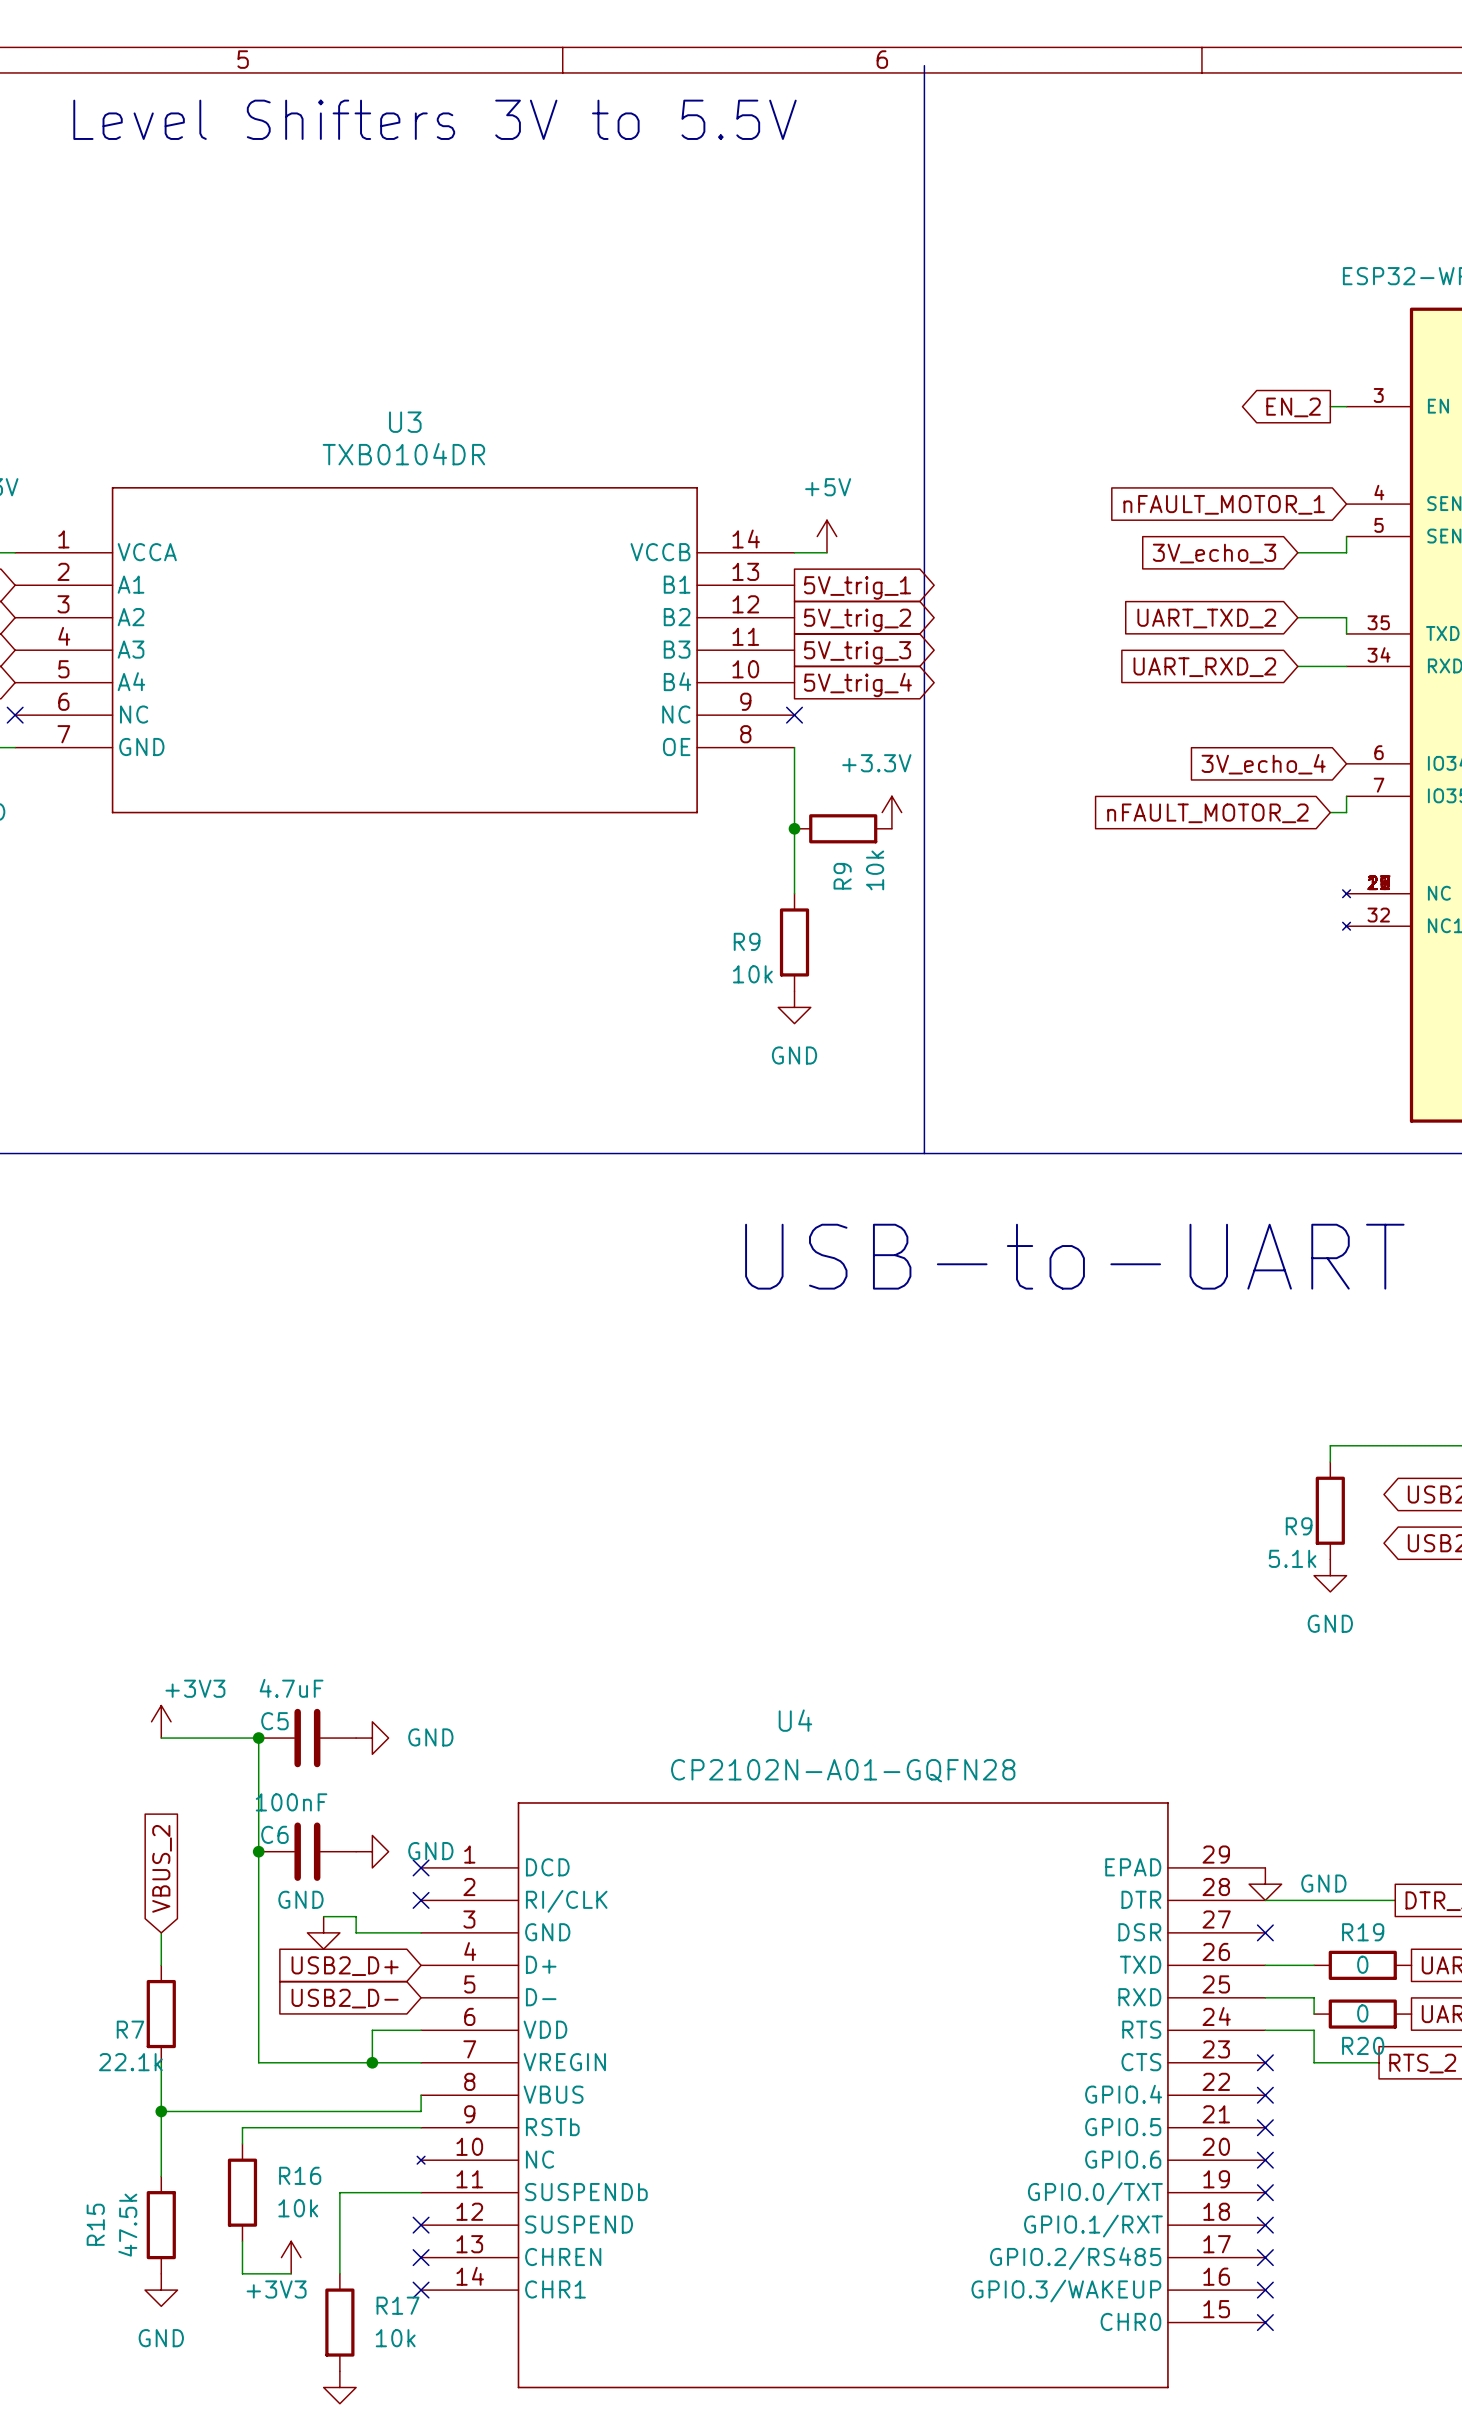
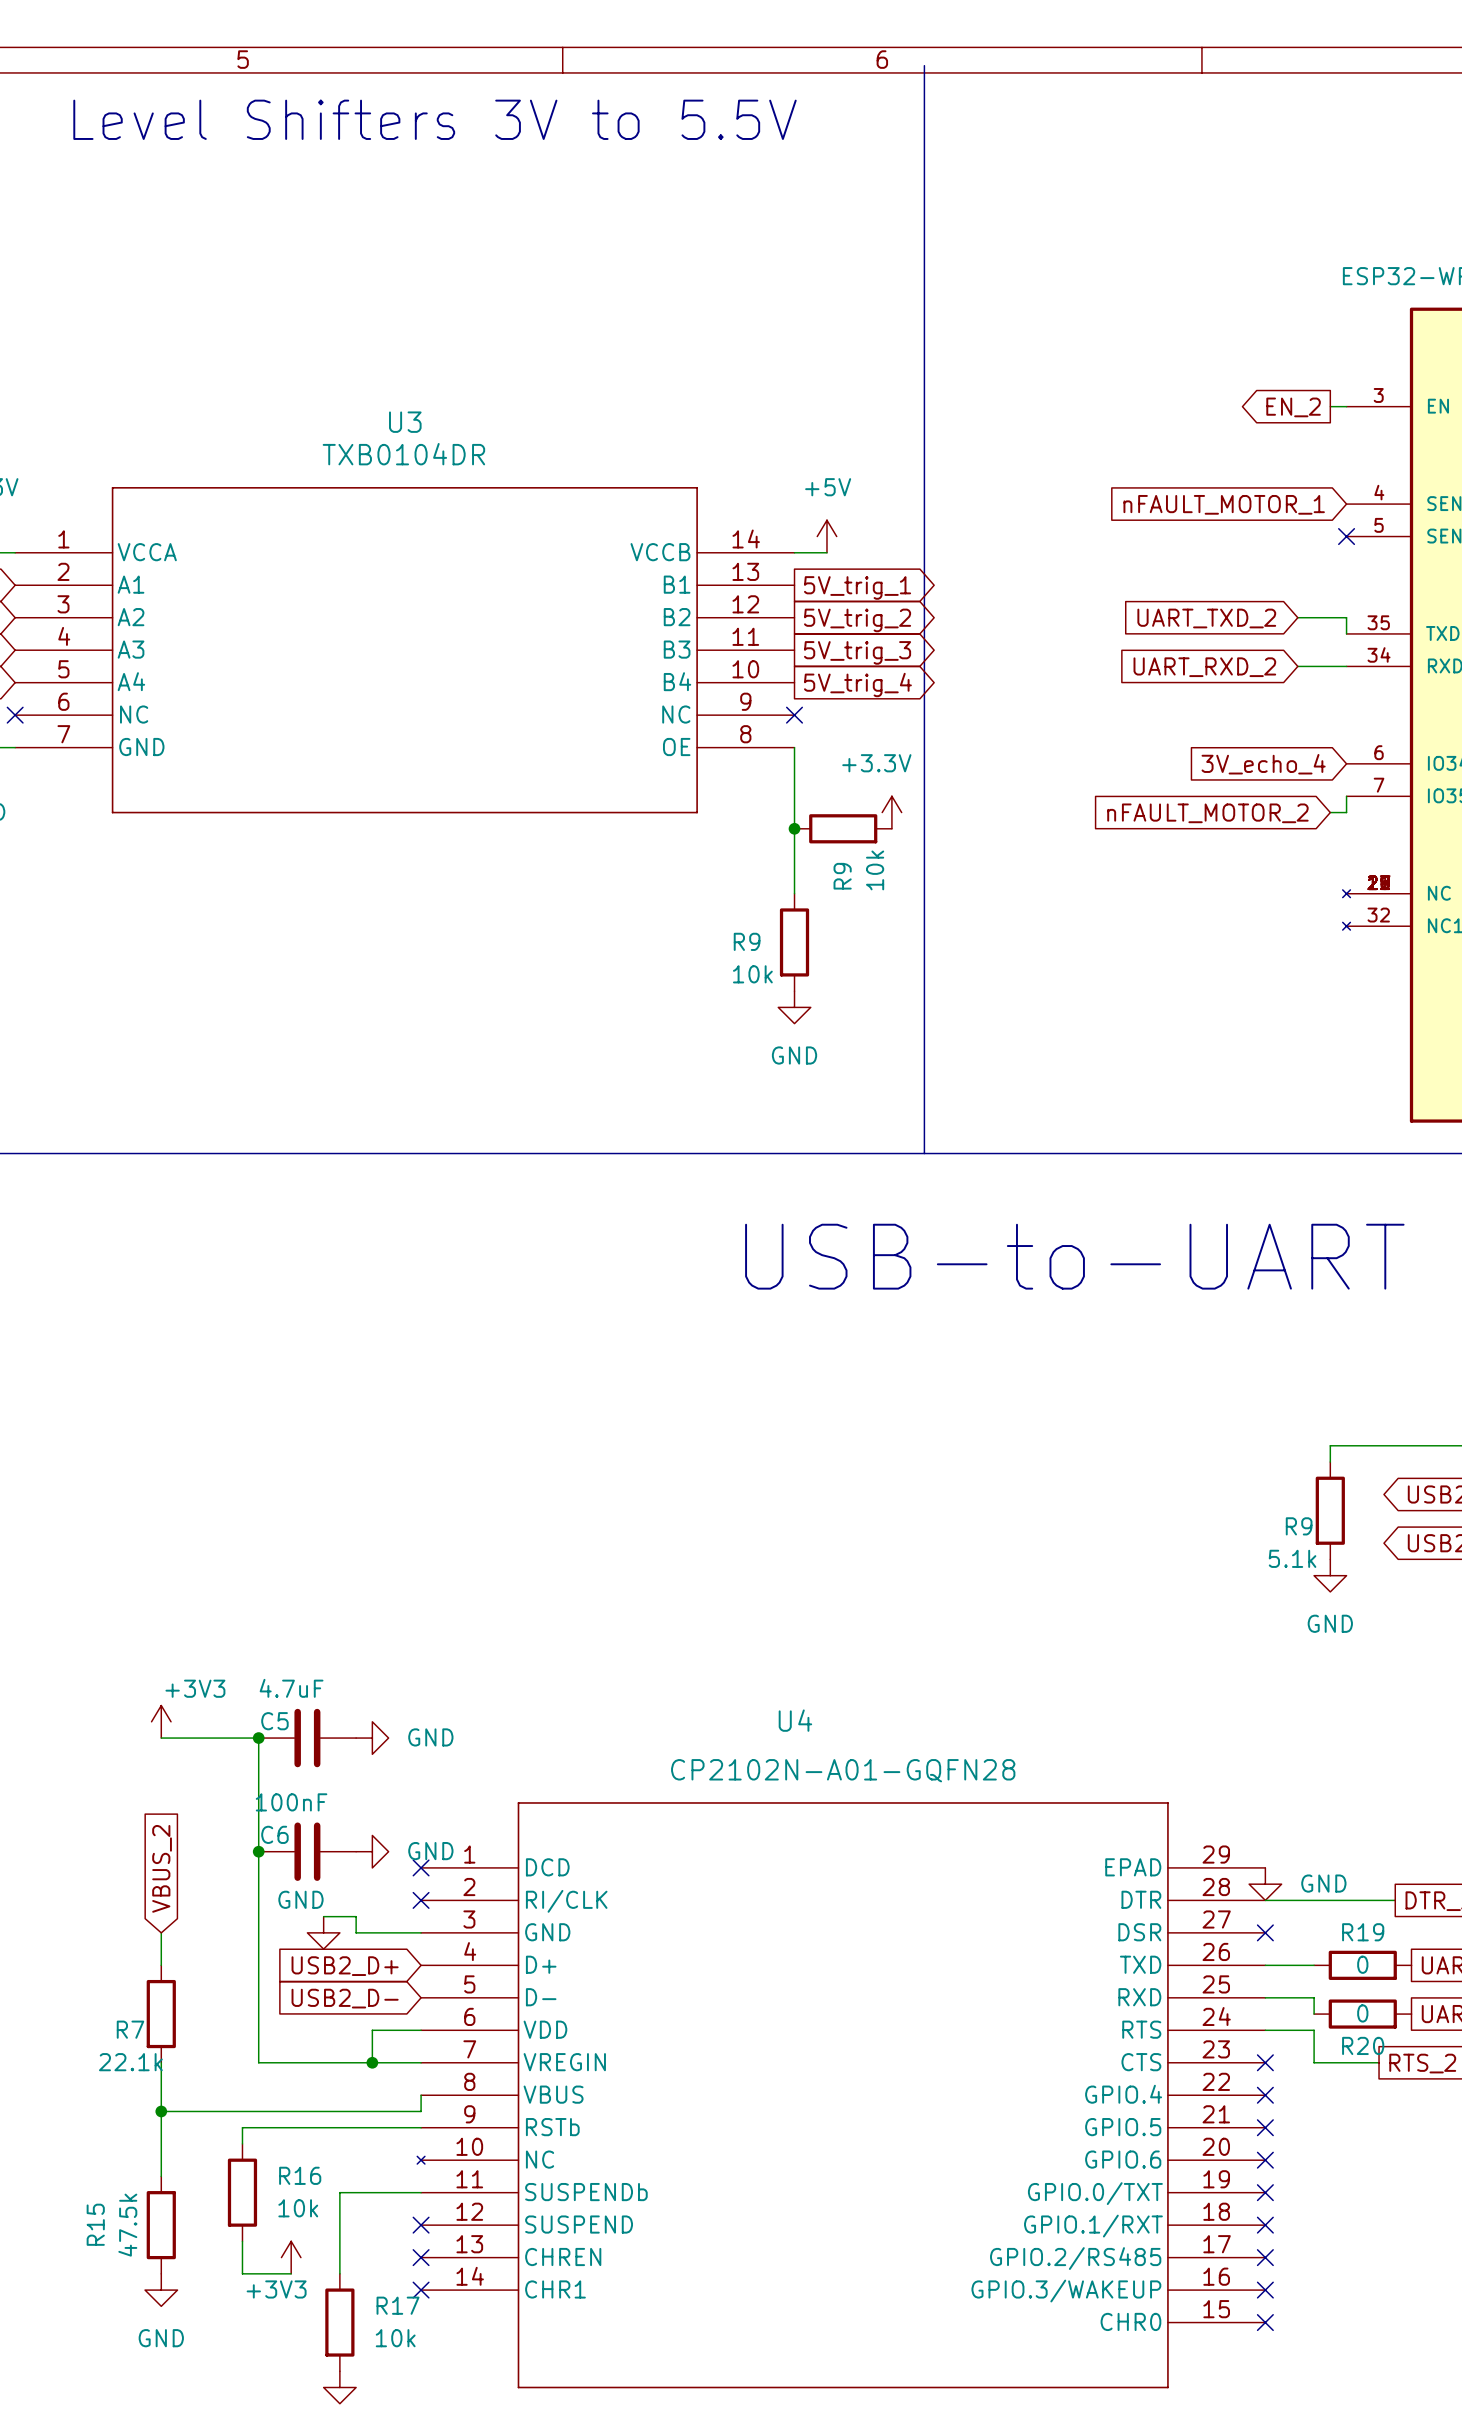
wire: (1346, 536) (1346, 552) (1297, 552) -> none
no-connect mark: none -> (1346, 536)
global label: 3V_echo_3 (1214, 553) -> none

